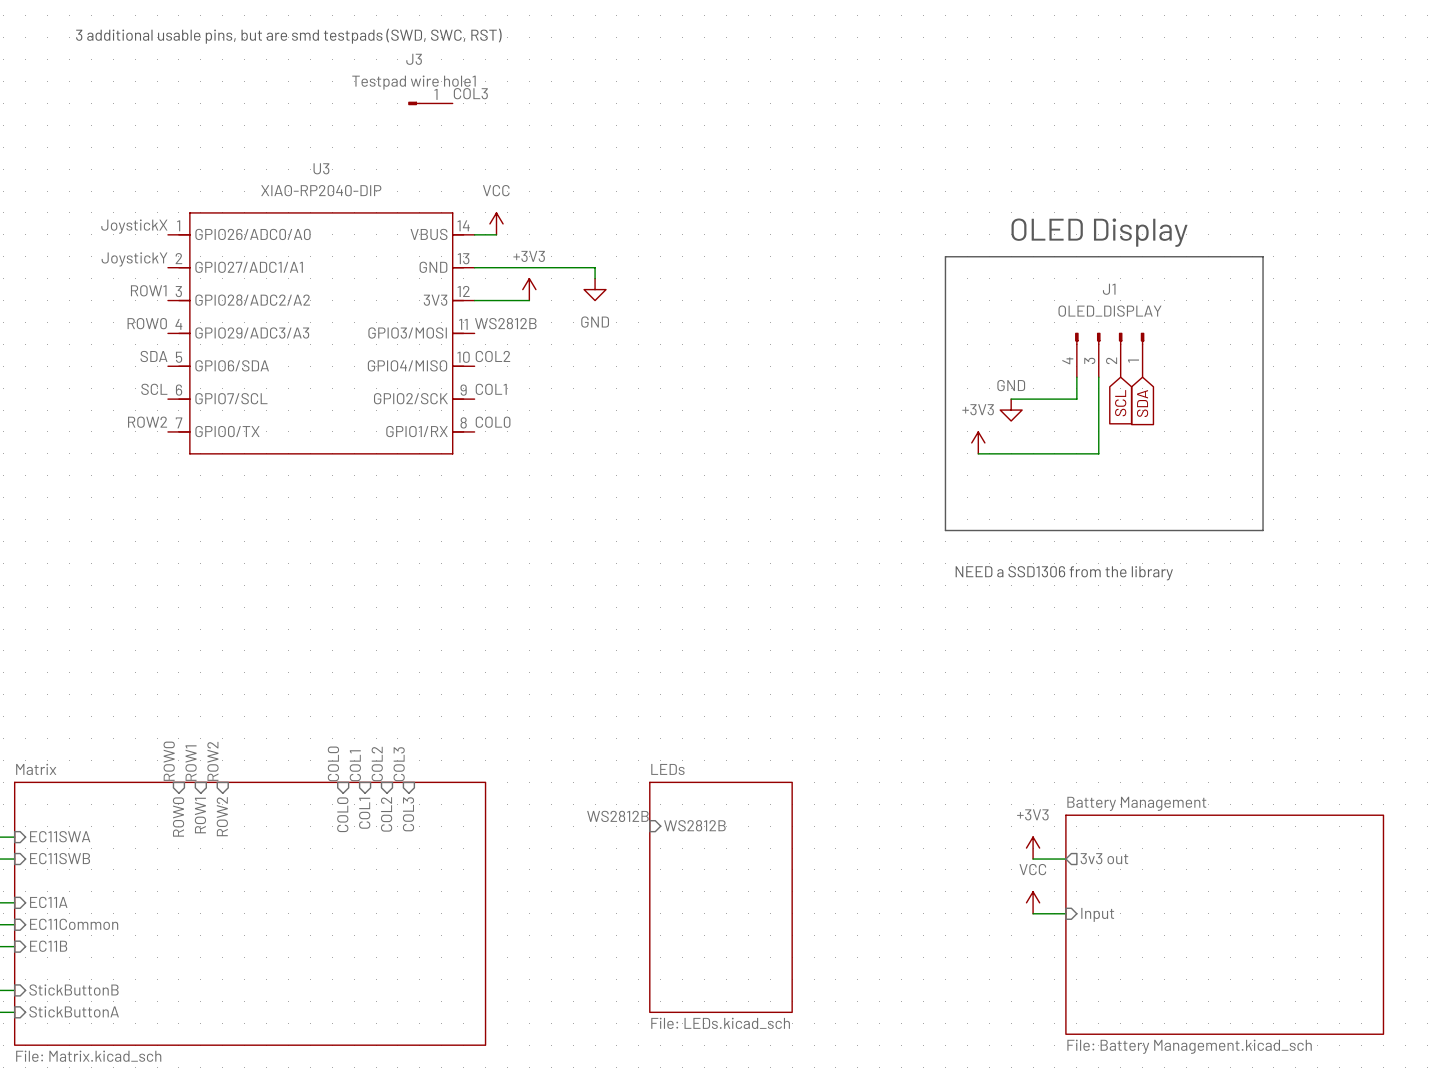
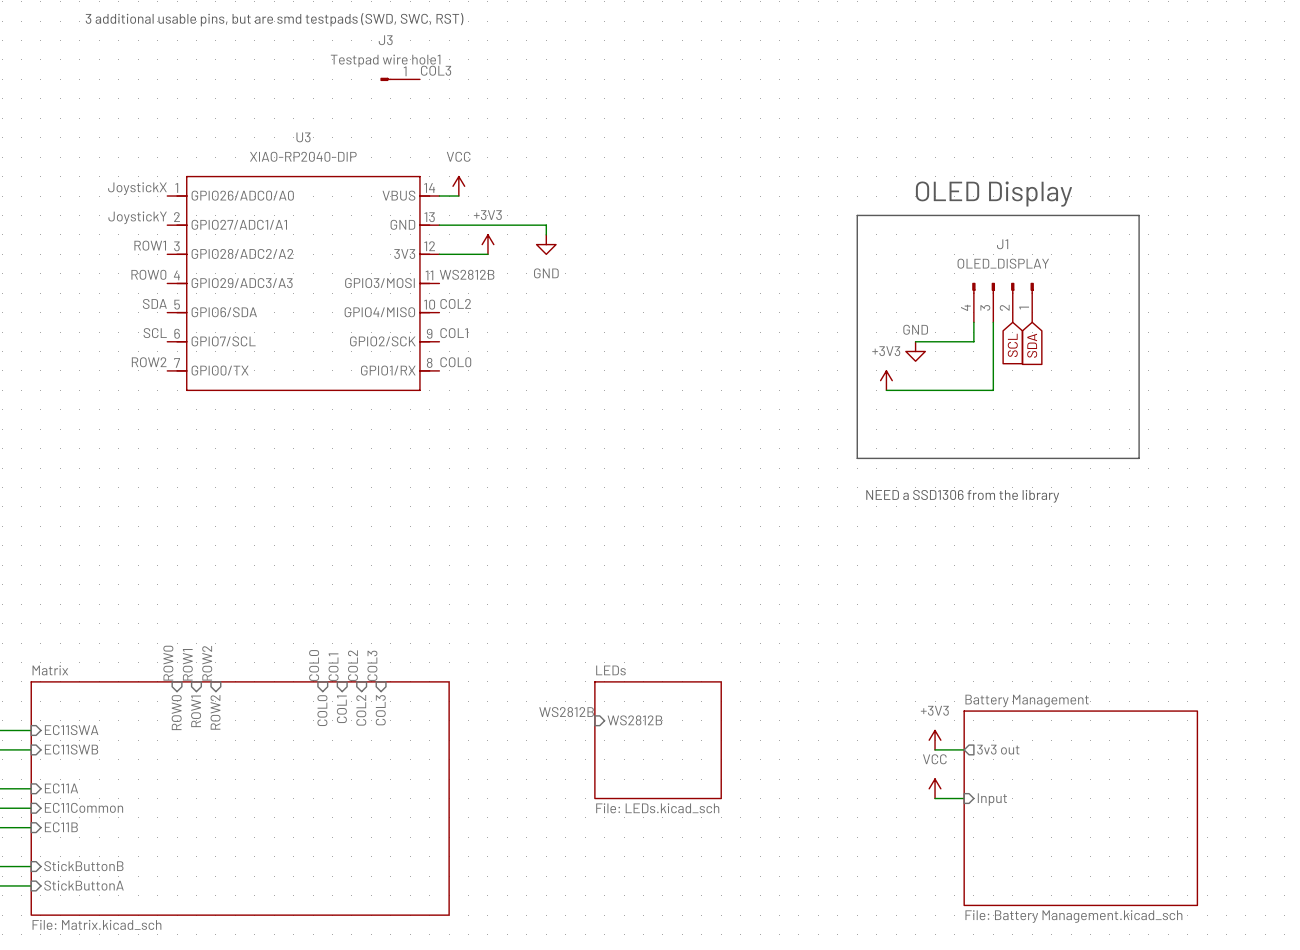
sheet LEDs: none -> File: LEDs.kicad_sch (658, 740)
sheet LEDs: File: LEDs.kicad_sch (720, 897) -> none
sheet Battery Management: none -> File: Battery Management.kicad_sch (1080, 808)
sheet Battery Management: File: Battery Management.kicad_sch (1224, 924) -> none

